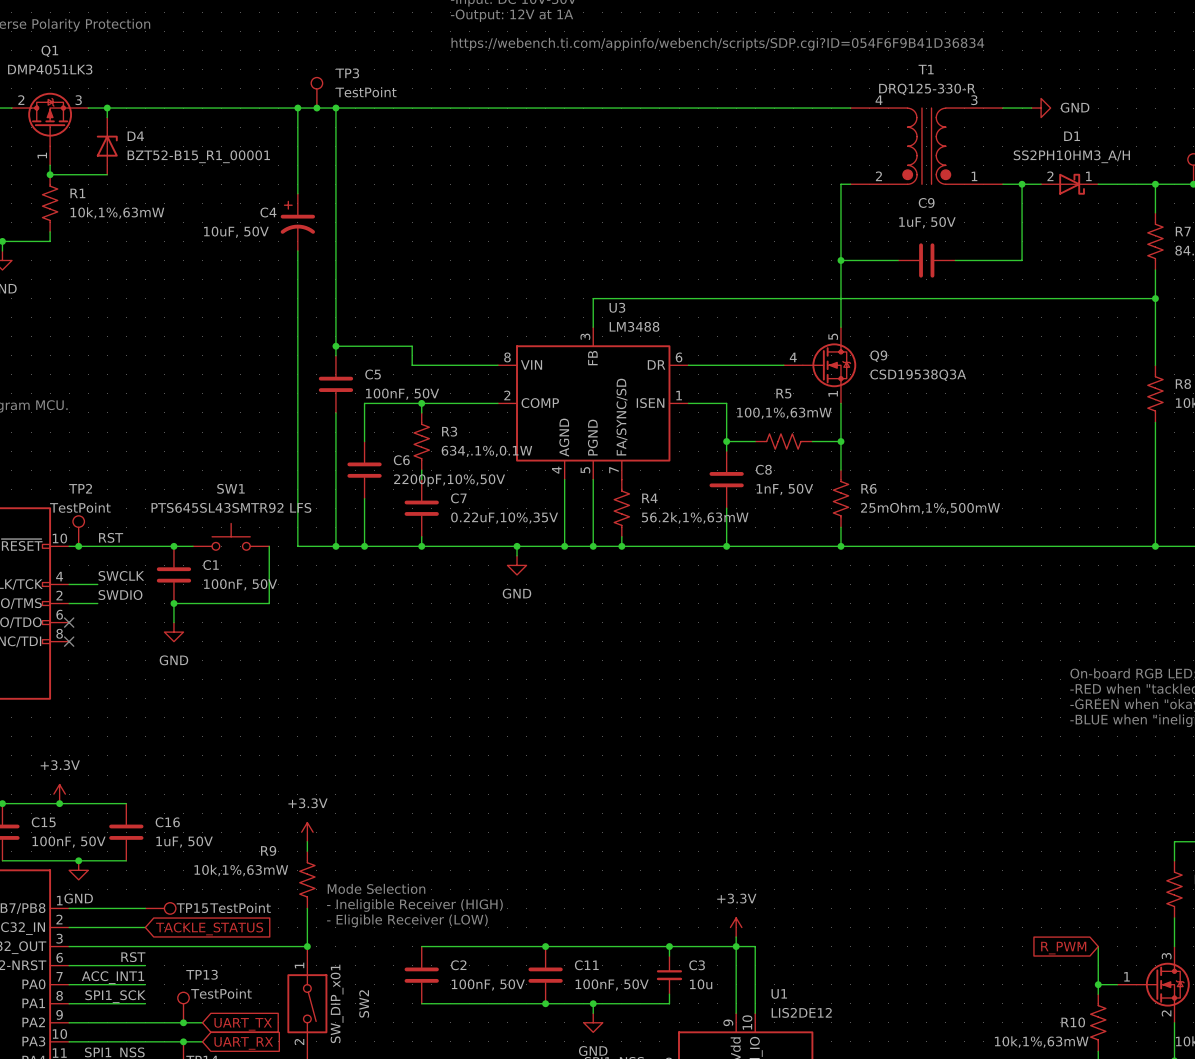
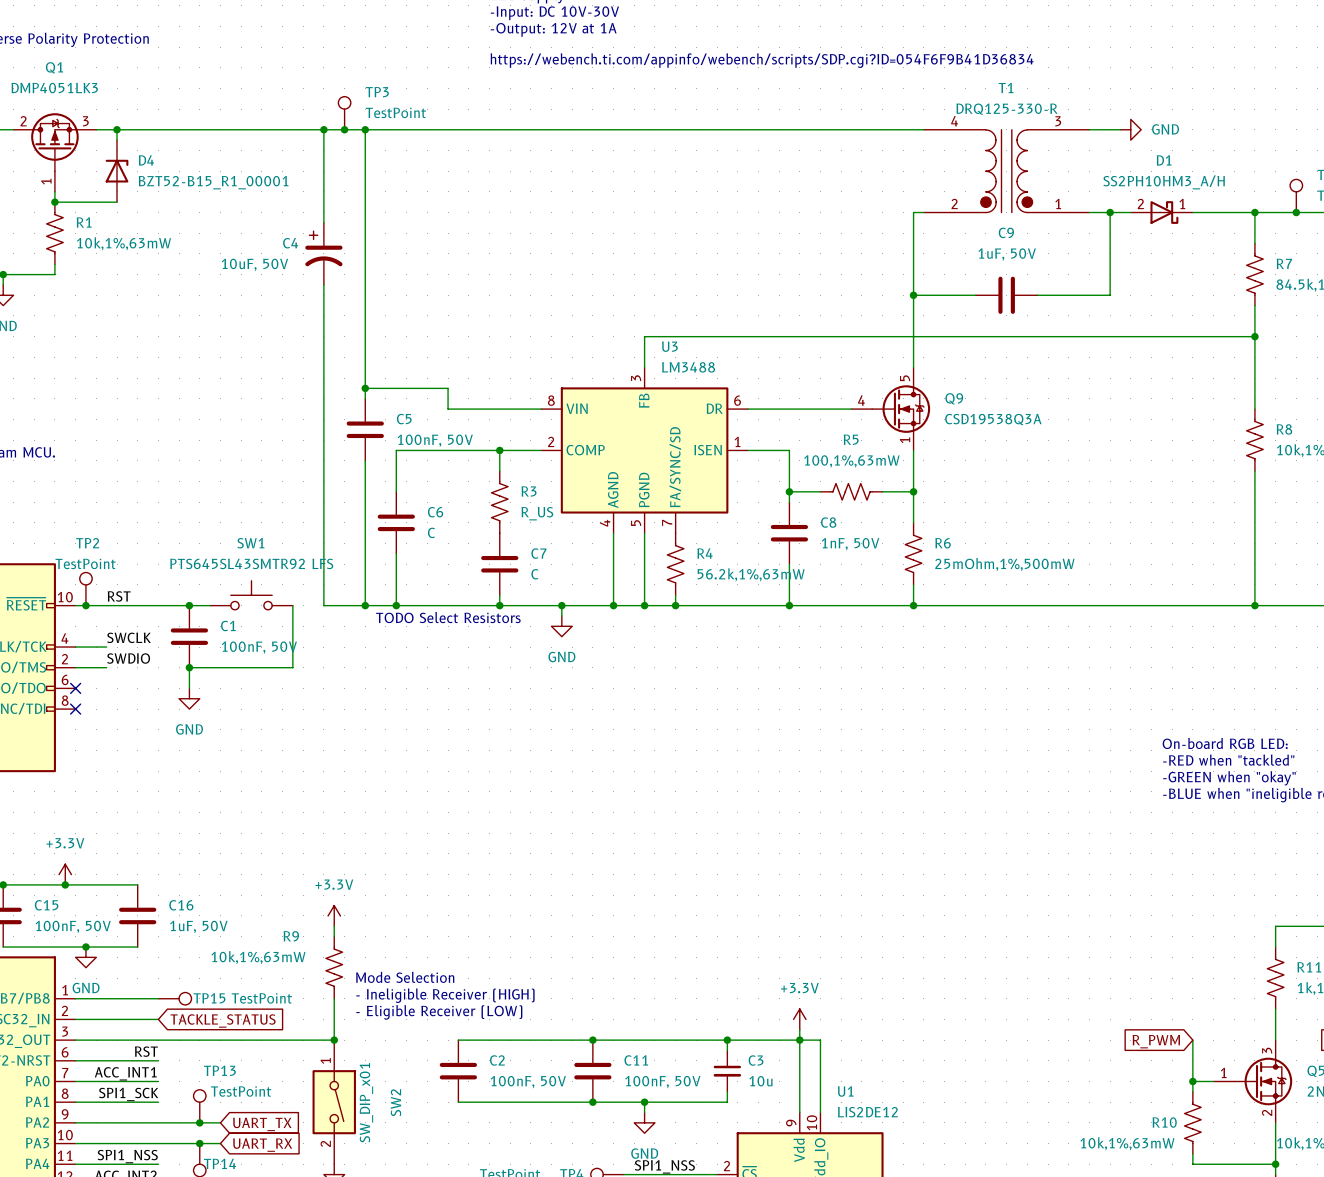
wire: (421, 403) (421, 412) -> none
junction position: (421, 403) -> (499, 450)
wire: none -> (499, 450) (499, 471)
R3 position: (421, 441) -> (499, 502)
R3 value: 634,.1%,0.1W (486, 451) -> R_US (537, 513)
wire: (421, 470) (421, 479) -> none
C6 value: 2200pF,10%,50V (449, 480) -> C (431, 532)
C7 position: (421, 508) -> (499, 564)
C7 value: 0.22uF,10%,35V (504, 518) -> C (534, 574)
wire: (421, 536) (421, 546) -> (499, 595) (499, 605)
junction position: (421, 546) -> (499, 605)
text: none -> TODO Select Resistors (448, 617)

